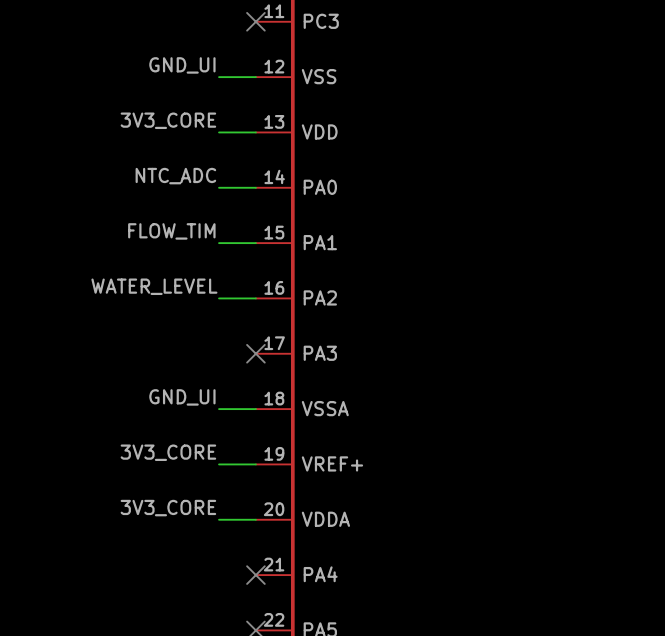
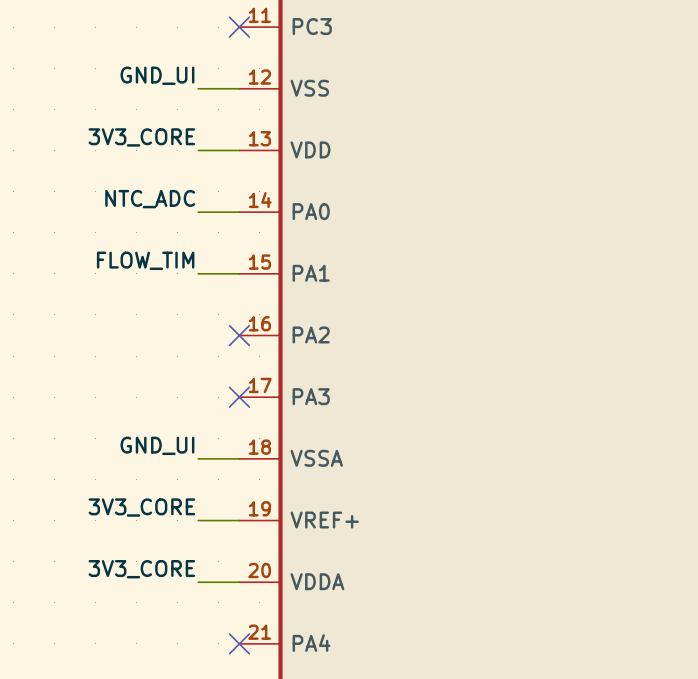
label: WATER_LEVEL (154, 286) -> none
wire: (219, 298) (255, 298) -> none
no-connect mark: none -> (239, 335)

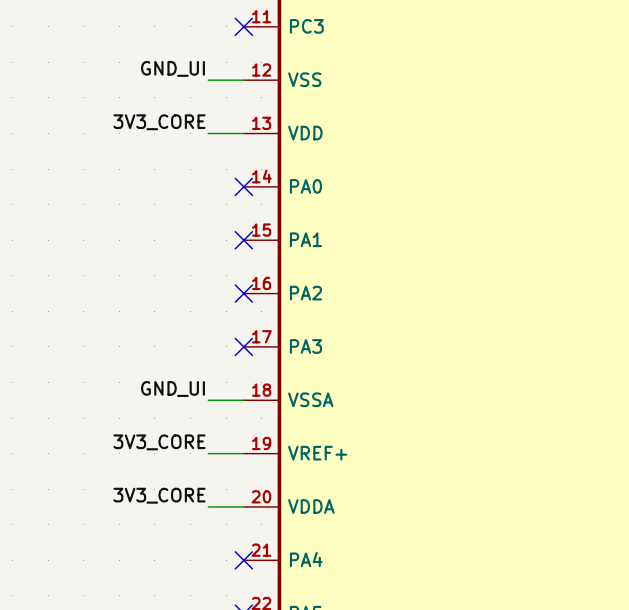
label: NTC_ADC (150, 199) -> none
wire: (198, 212) (239, 212) -> none
no-connect mark: none -> (243, 186)
label: FLOW_TIM (145, 260) -> none
wire: (198, 273) (239, 273) -> none
no-connect mark: none -> (243, 240)

